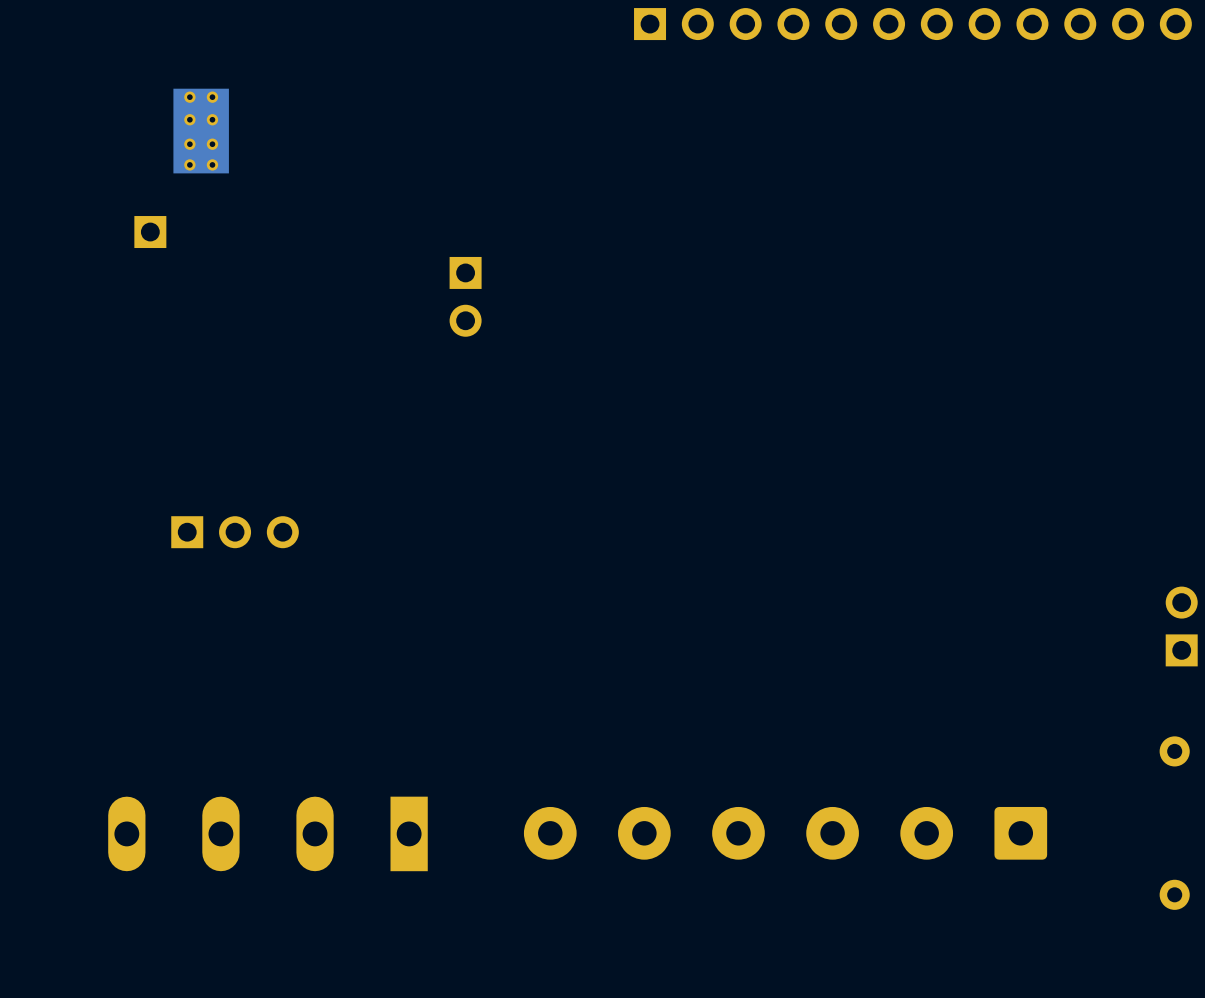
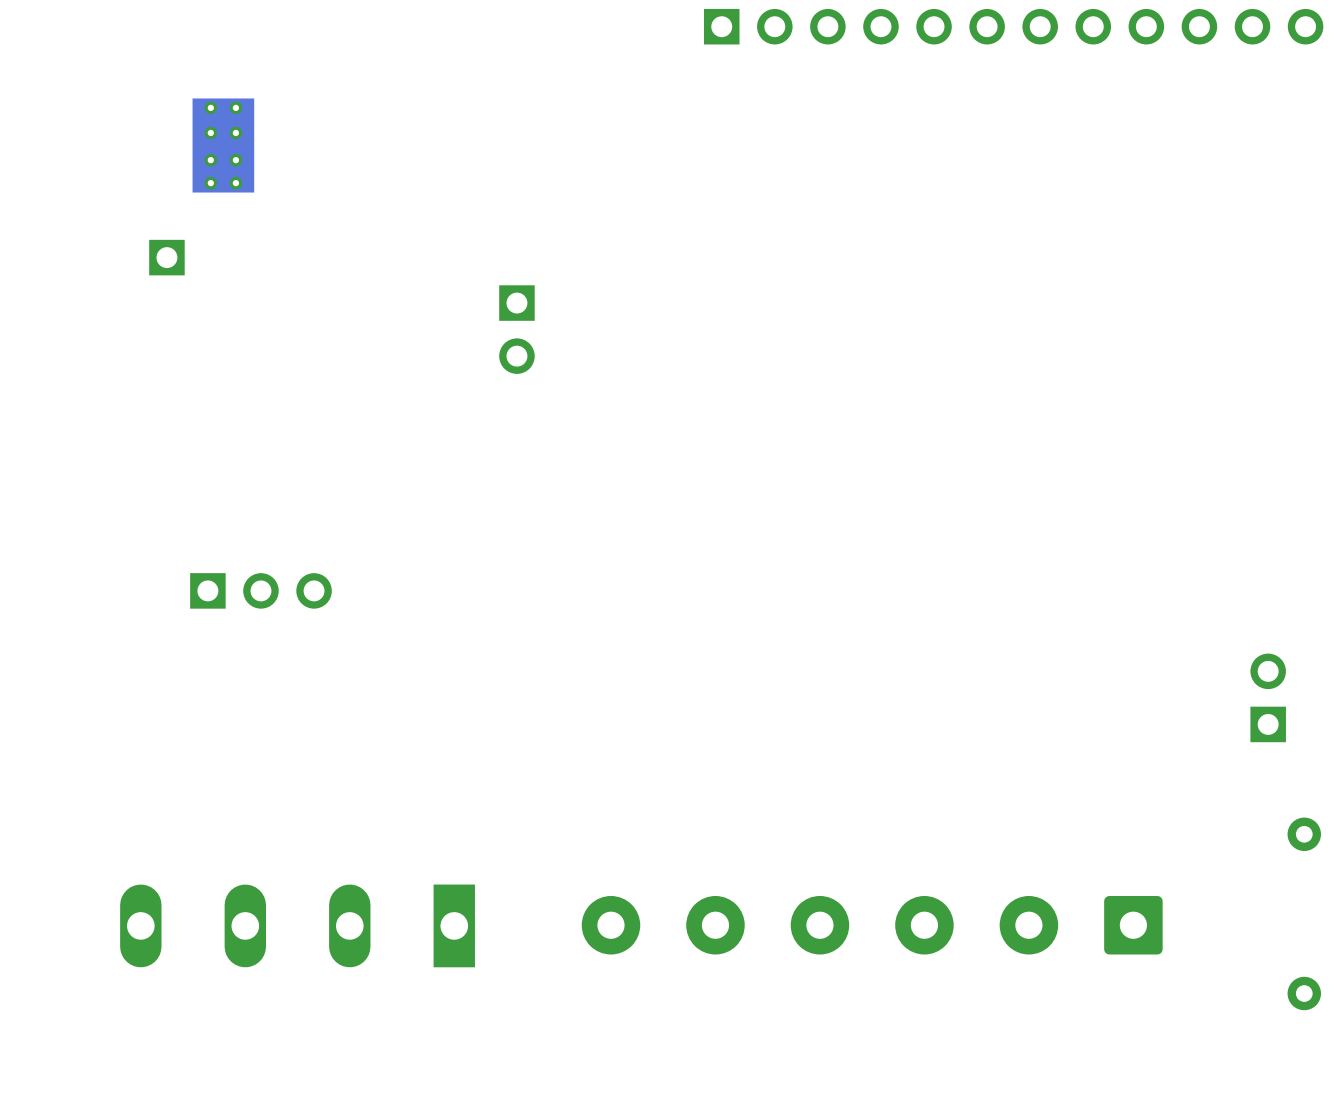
part position: (1181, 626) -> (1268, 697)

